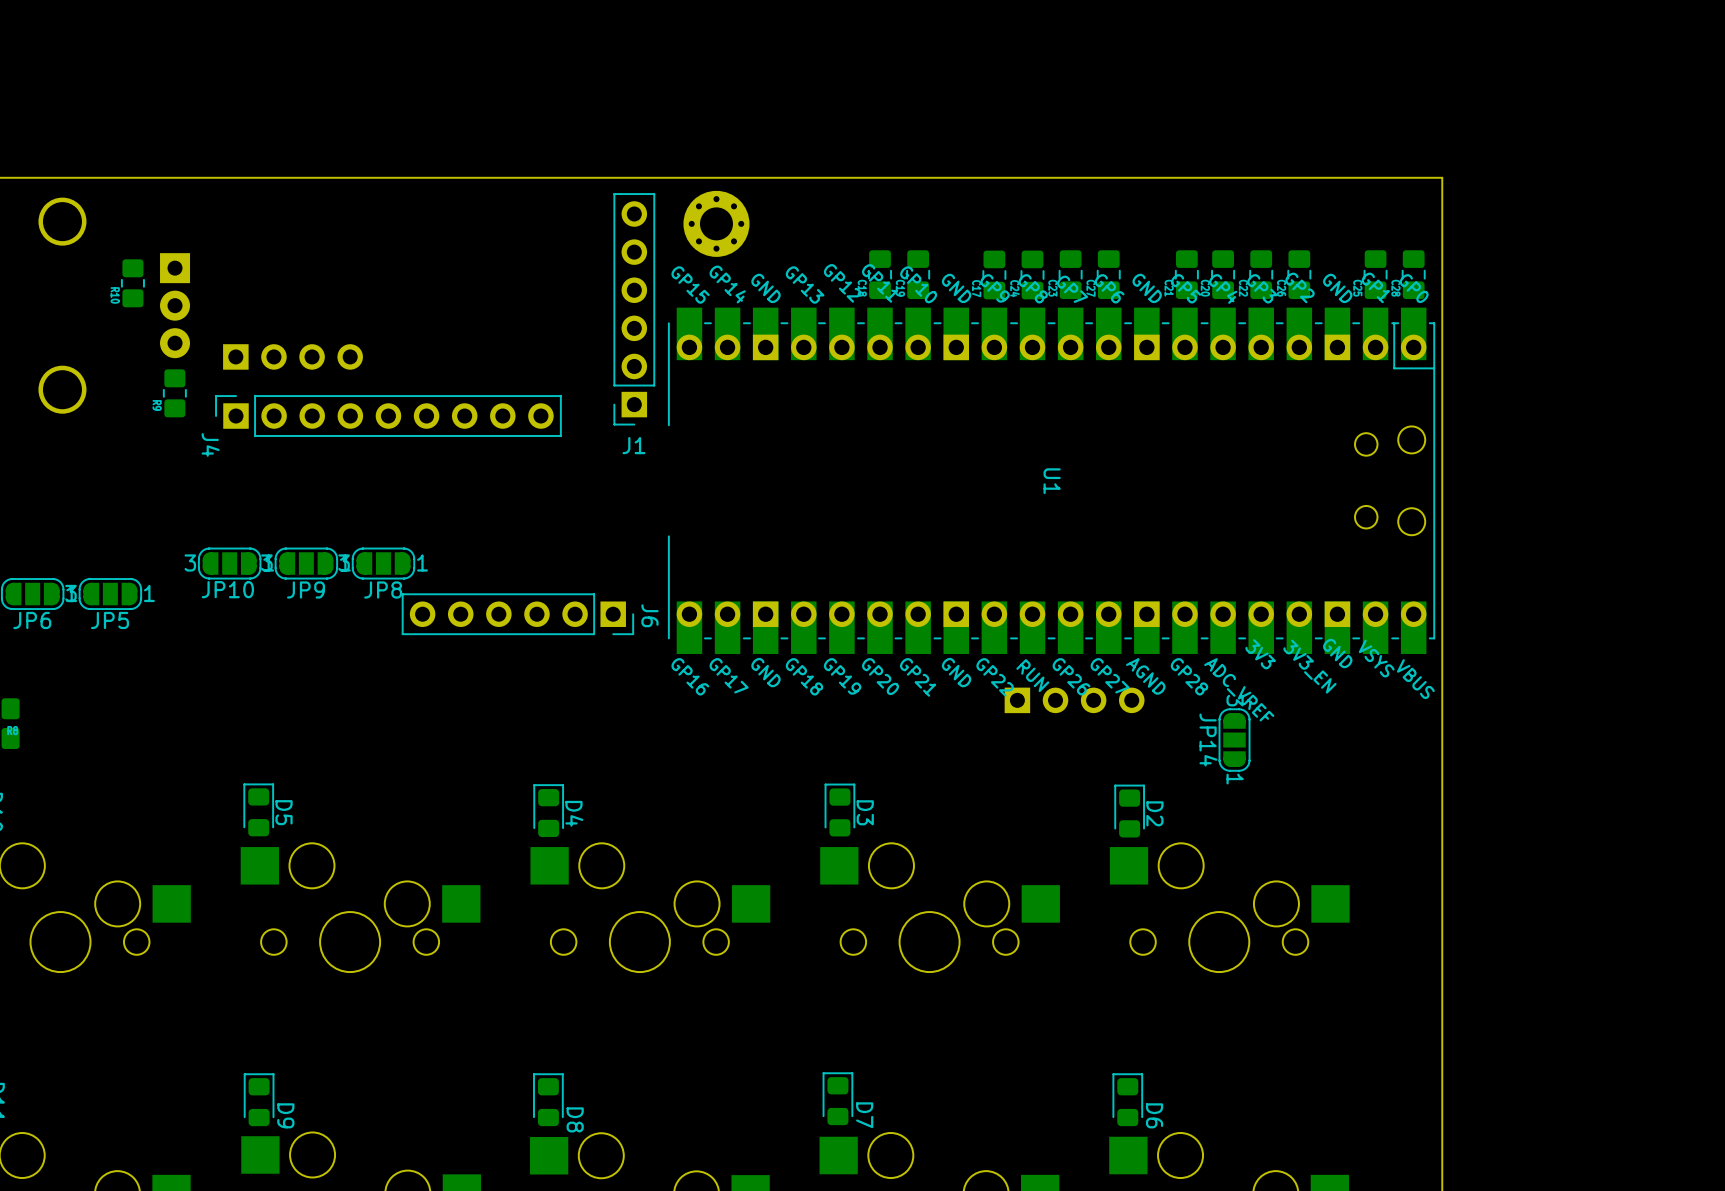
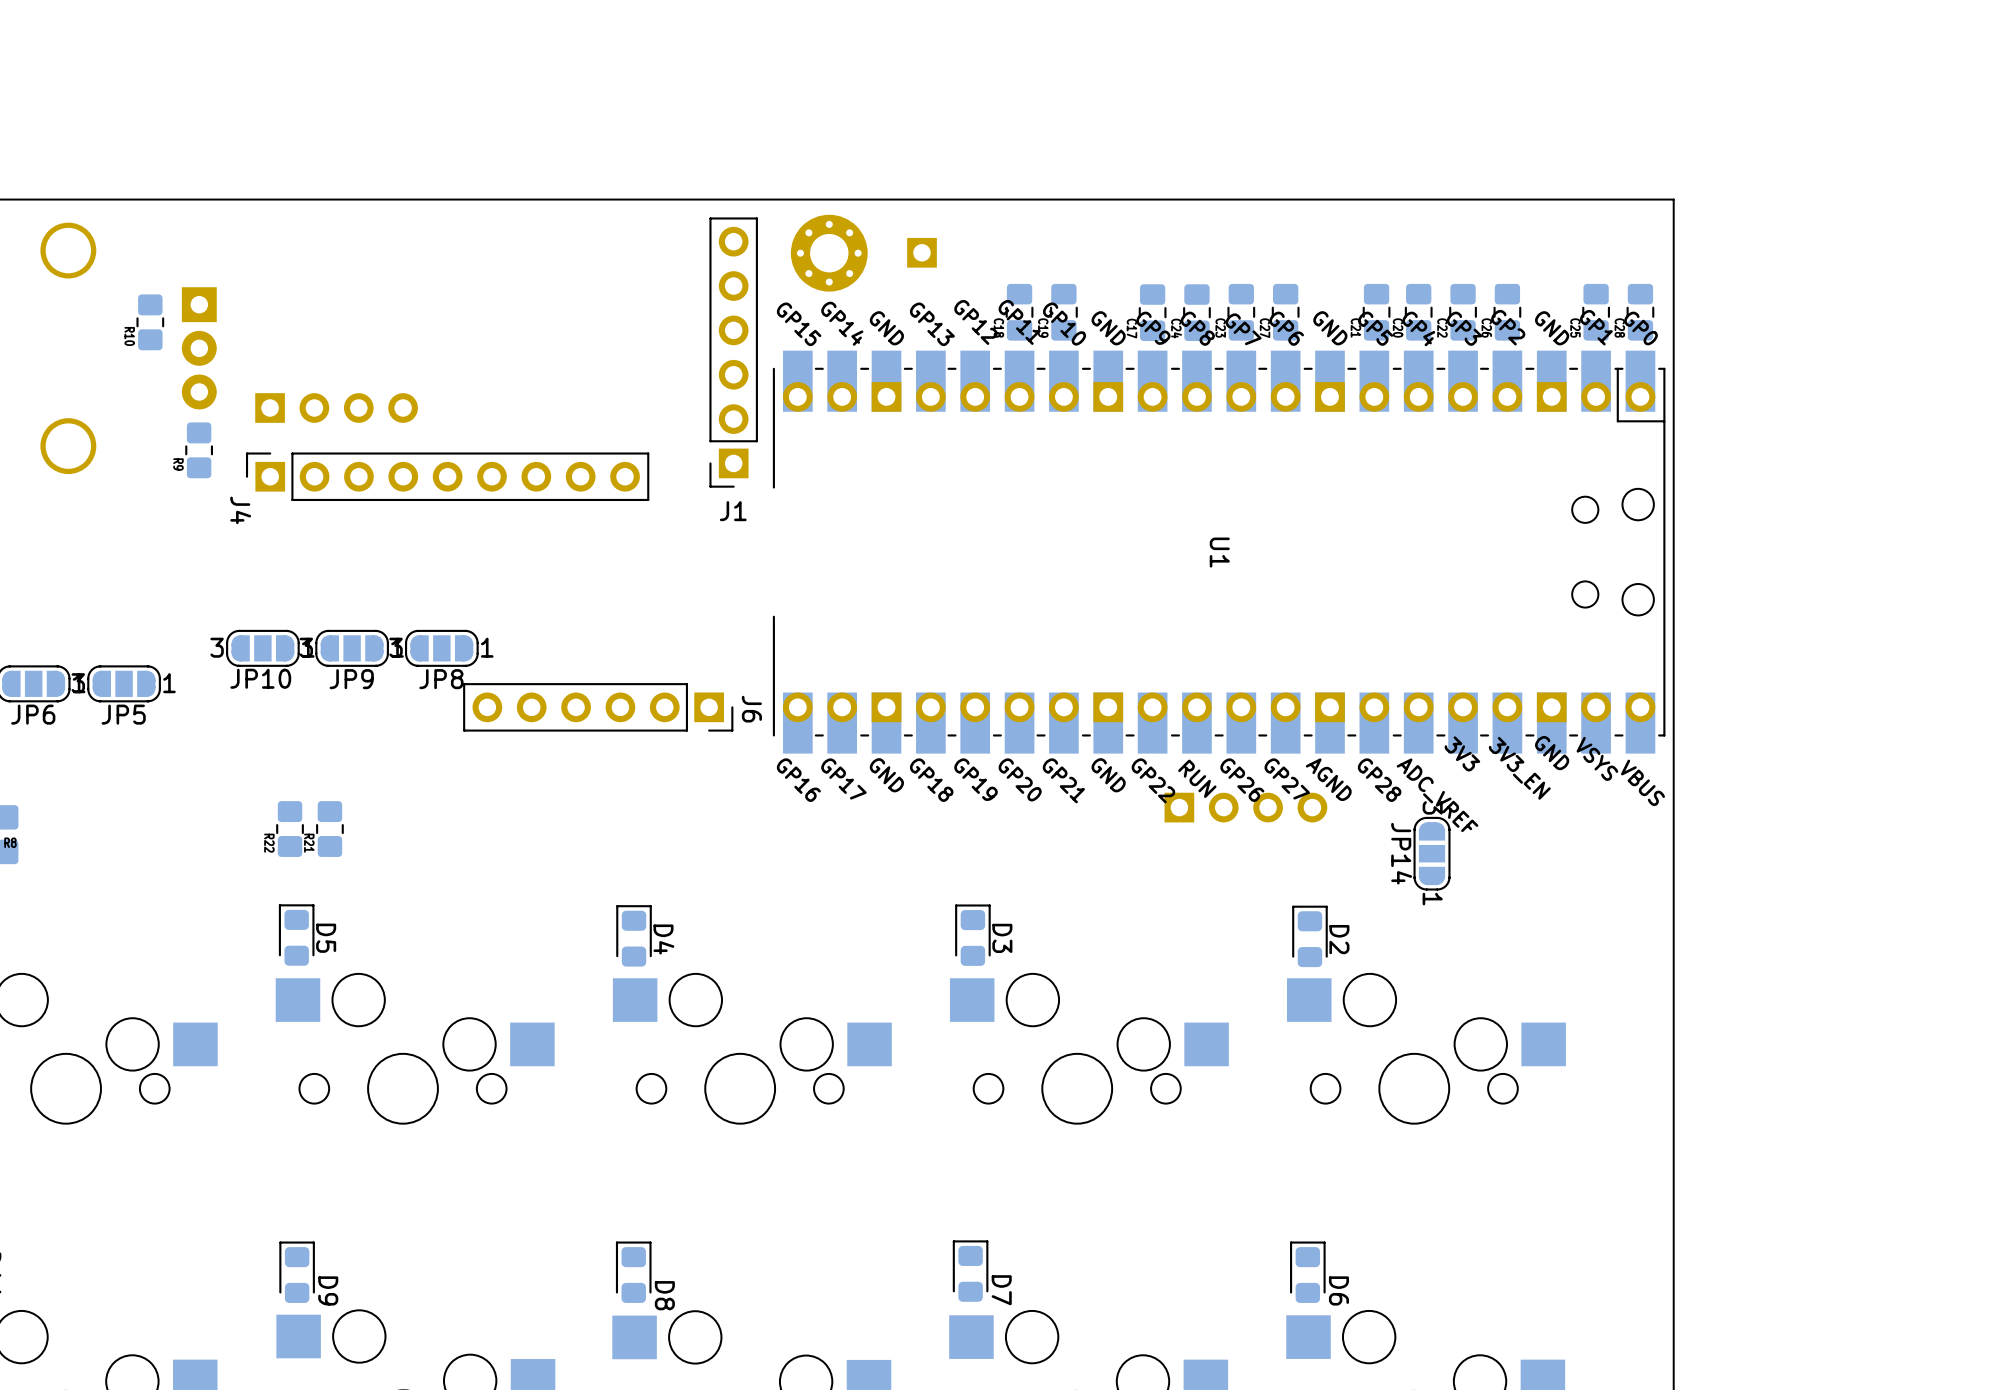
part: none -> (921, 252)
R22: none -> (290, 829)
R21: none -> (329, 829)

